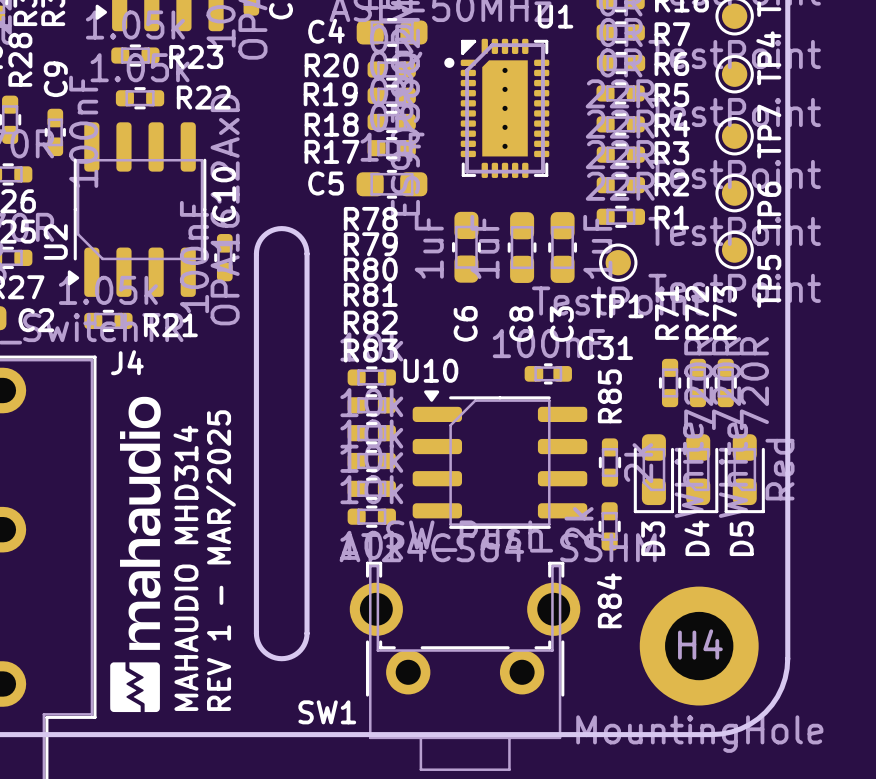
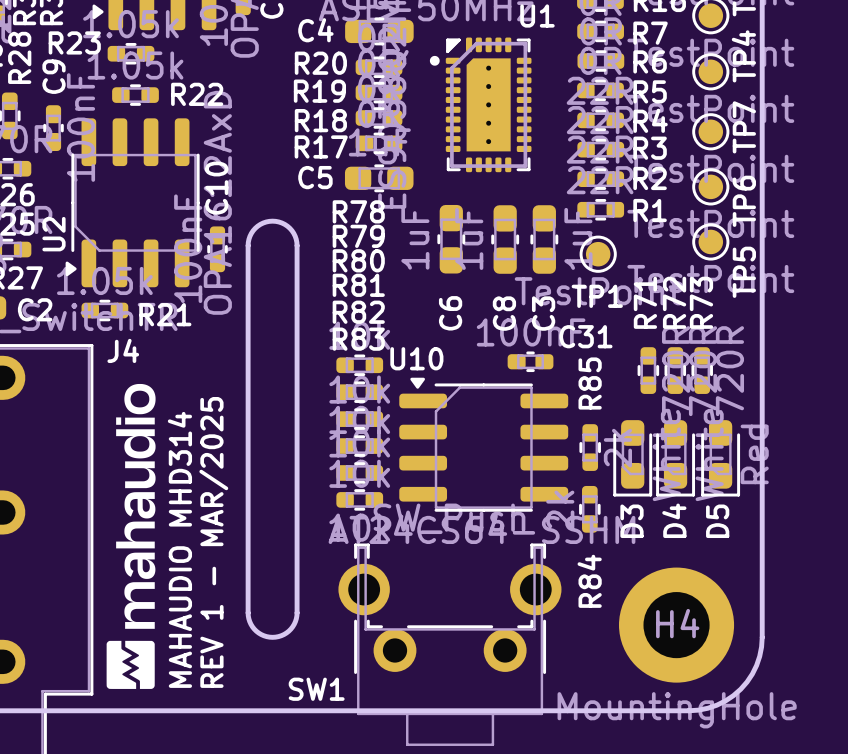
R23 name position: R23 (196, 57) -> R23 (74, 42)

